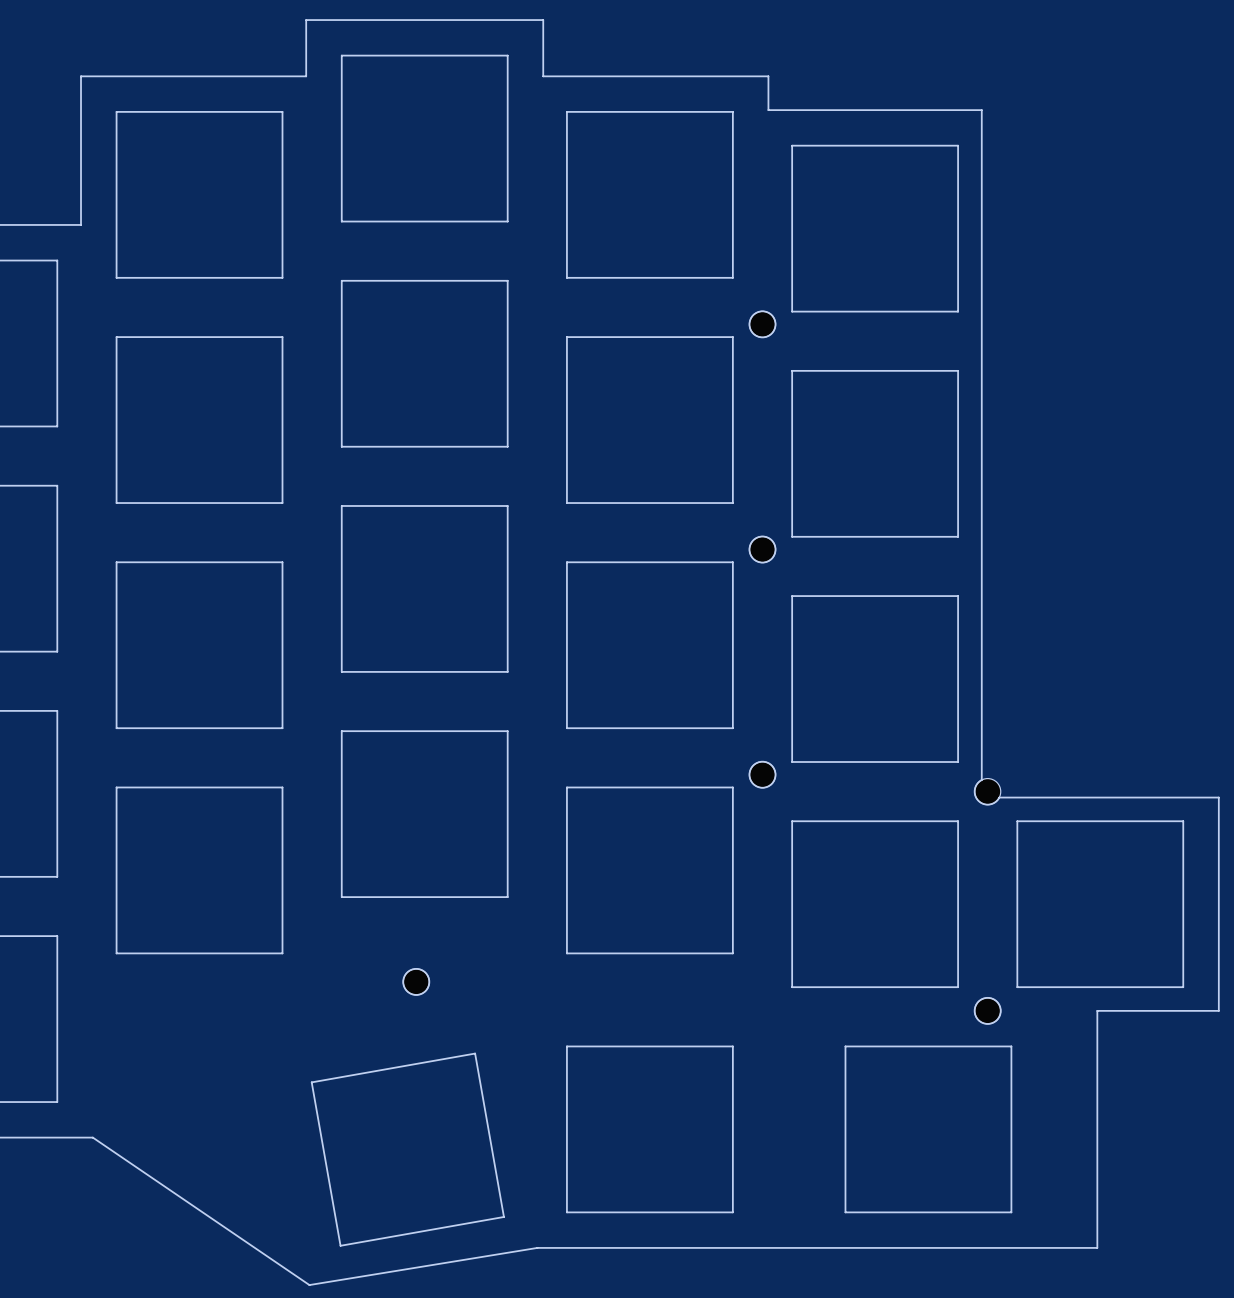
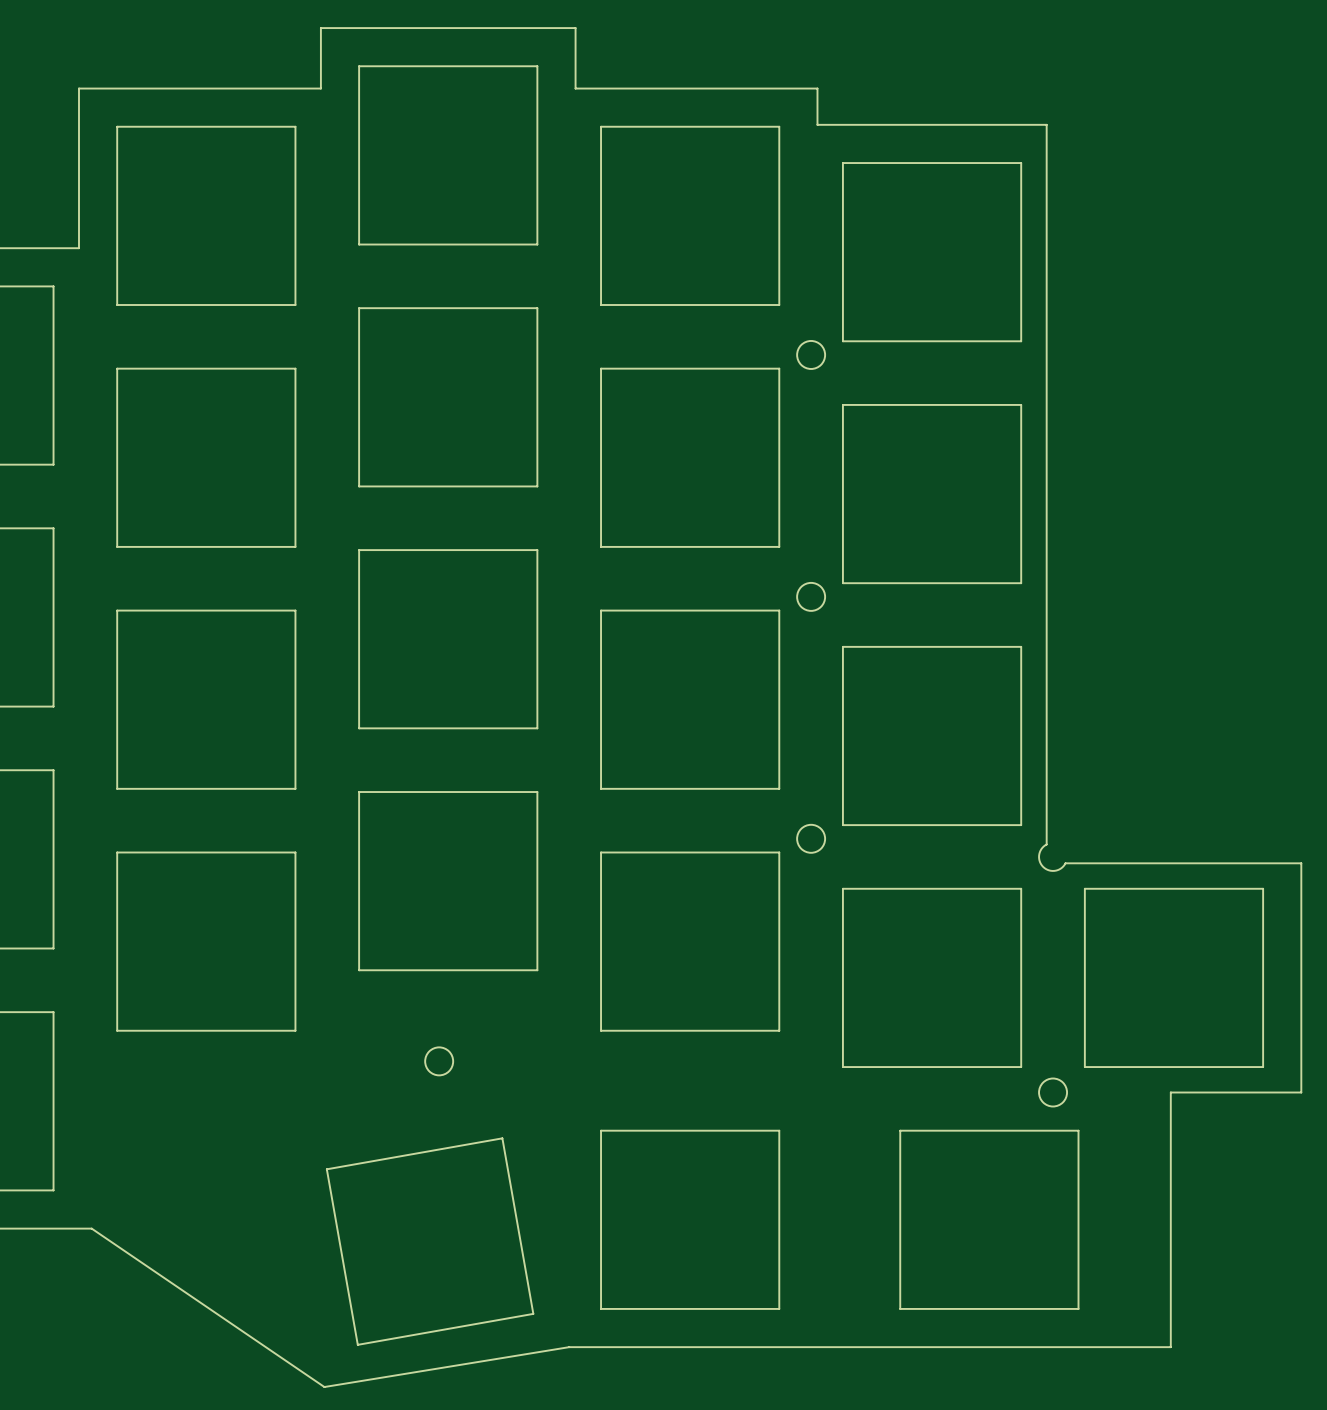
part: (762, 324) -> none
part: (762, 549) -> none
part: (762, 774) -> none
part: (987, 791) -> none
part: (416, 981) -> none
part: (987, 1010) -> none

